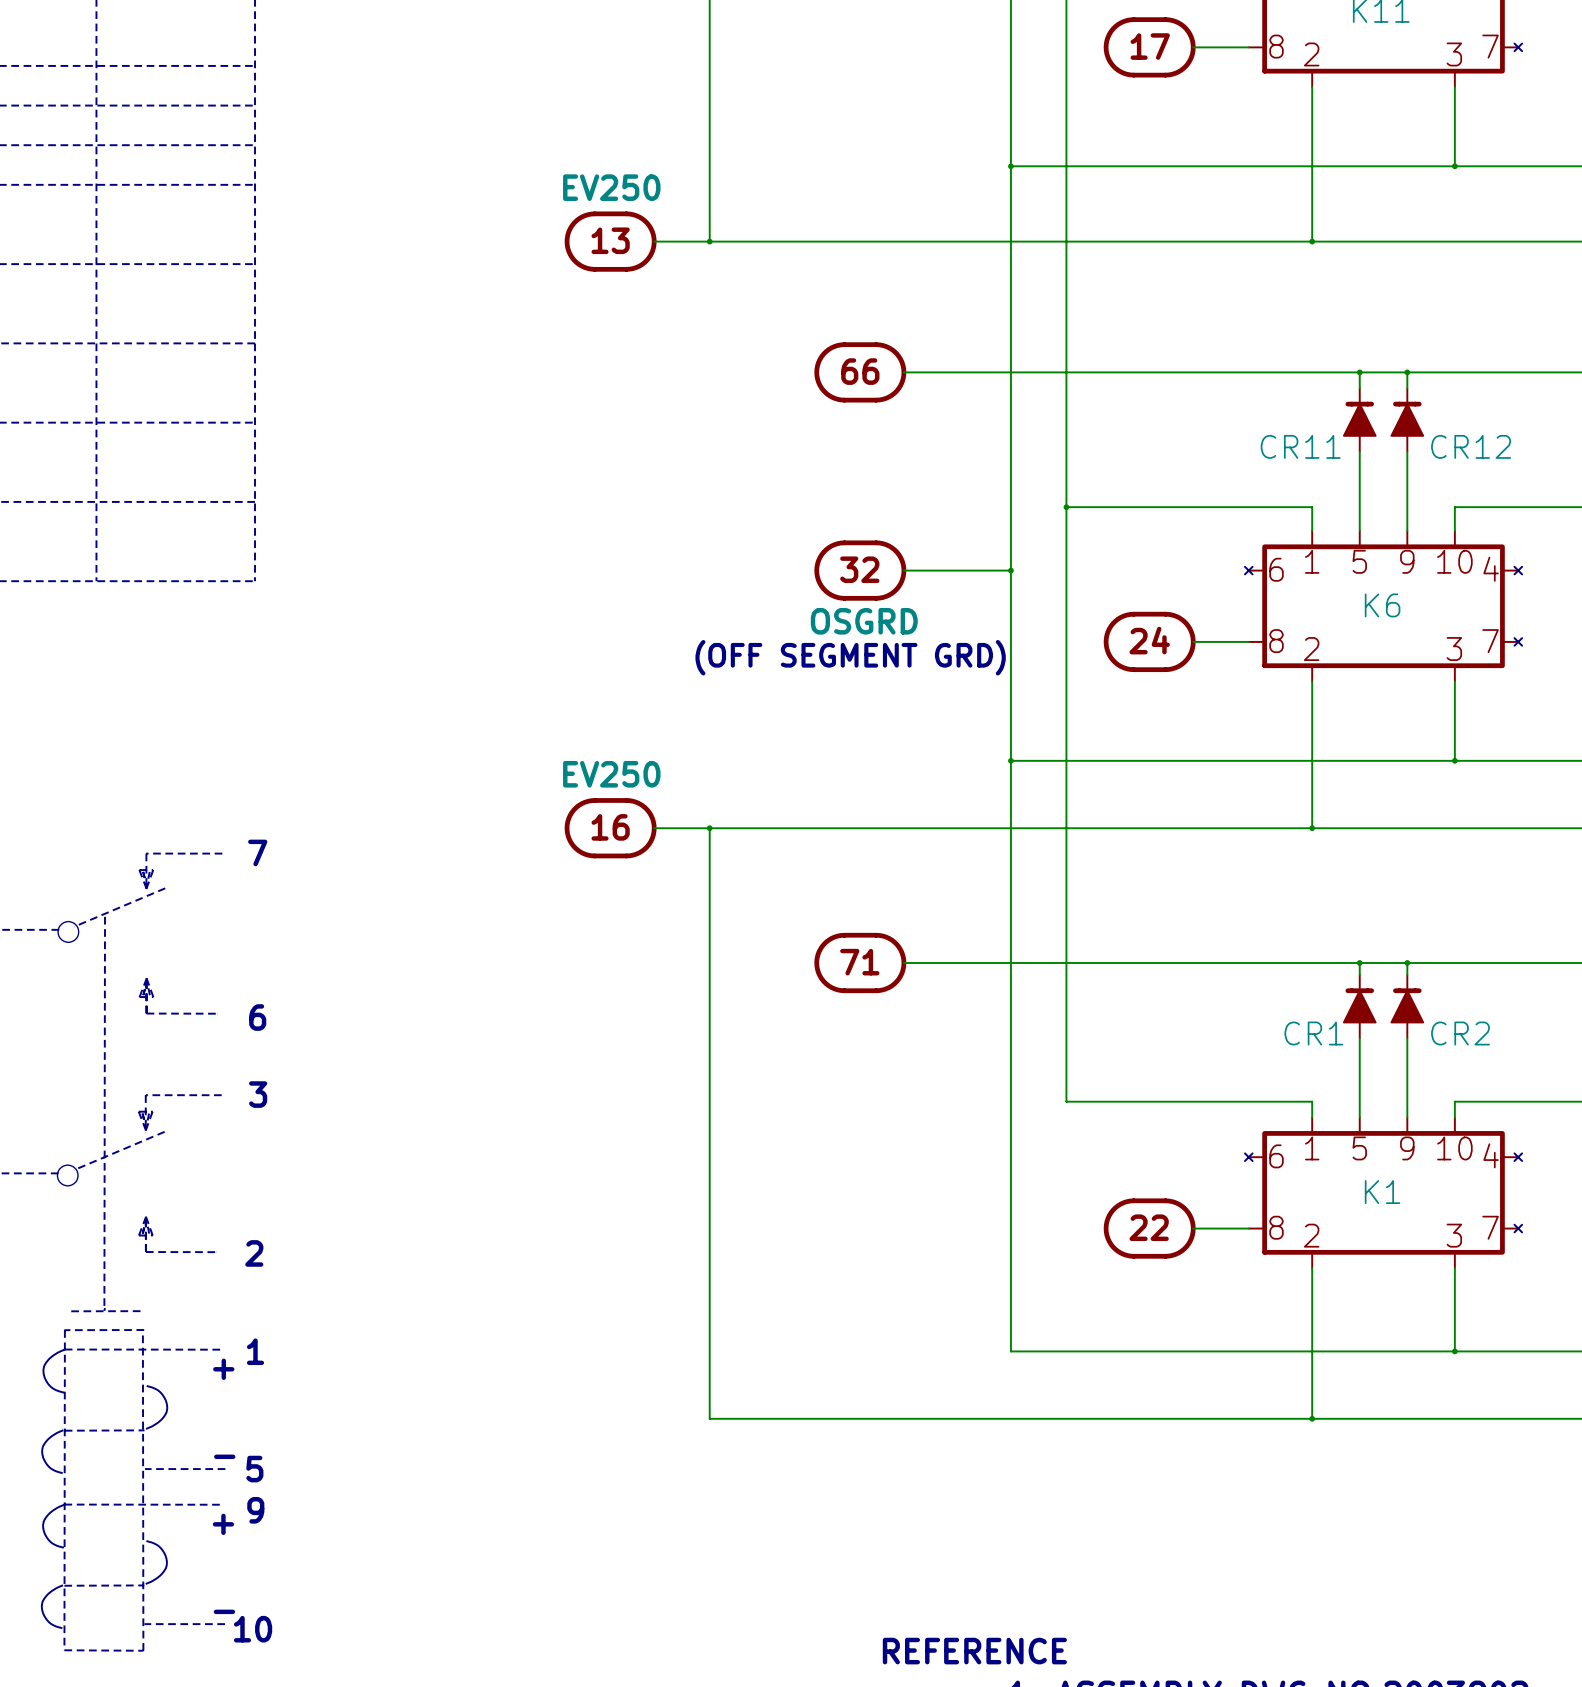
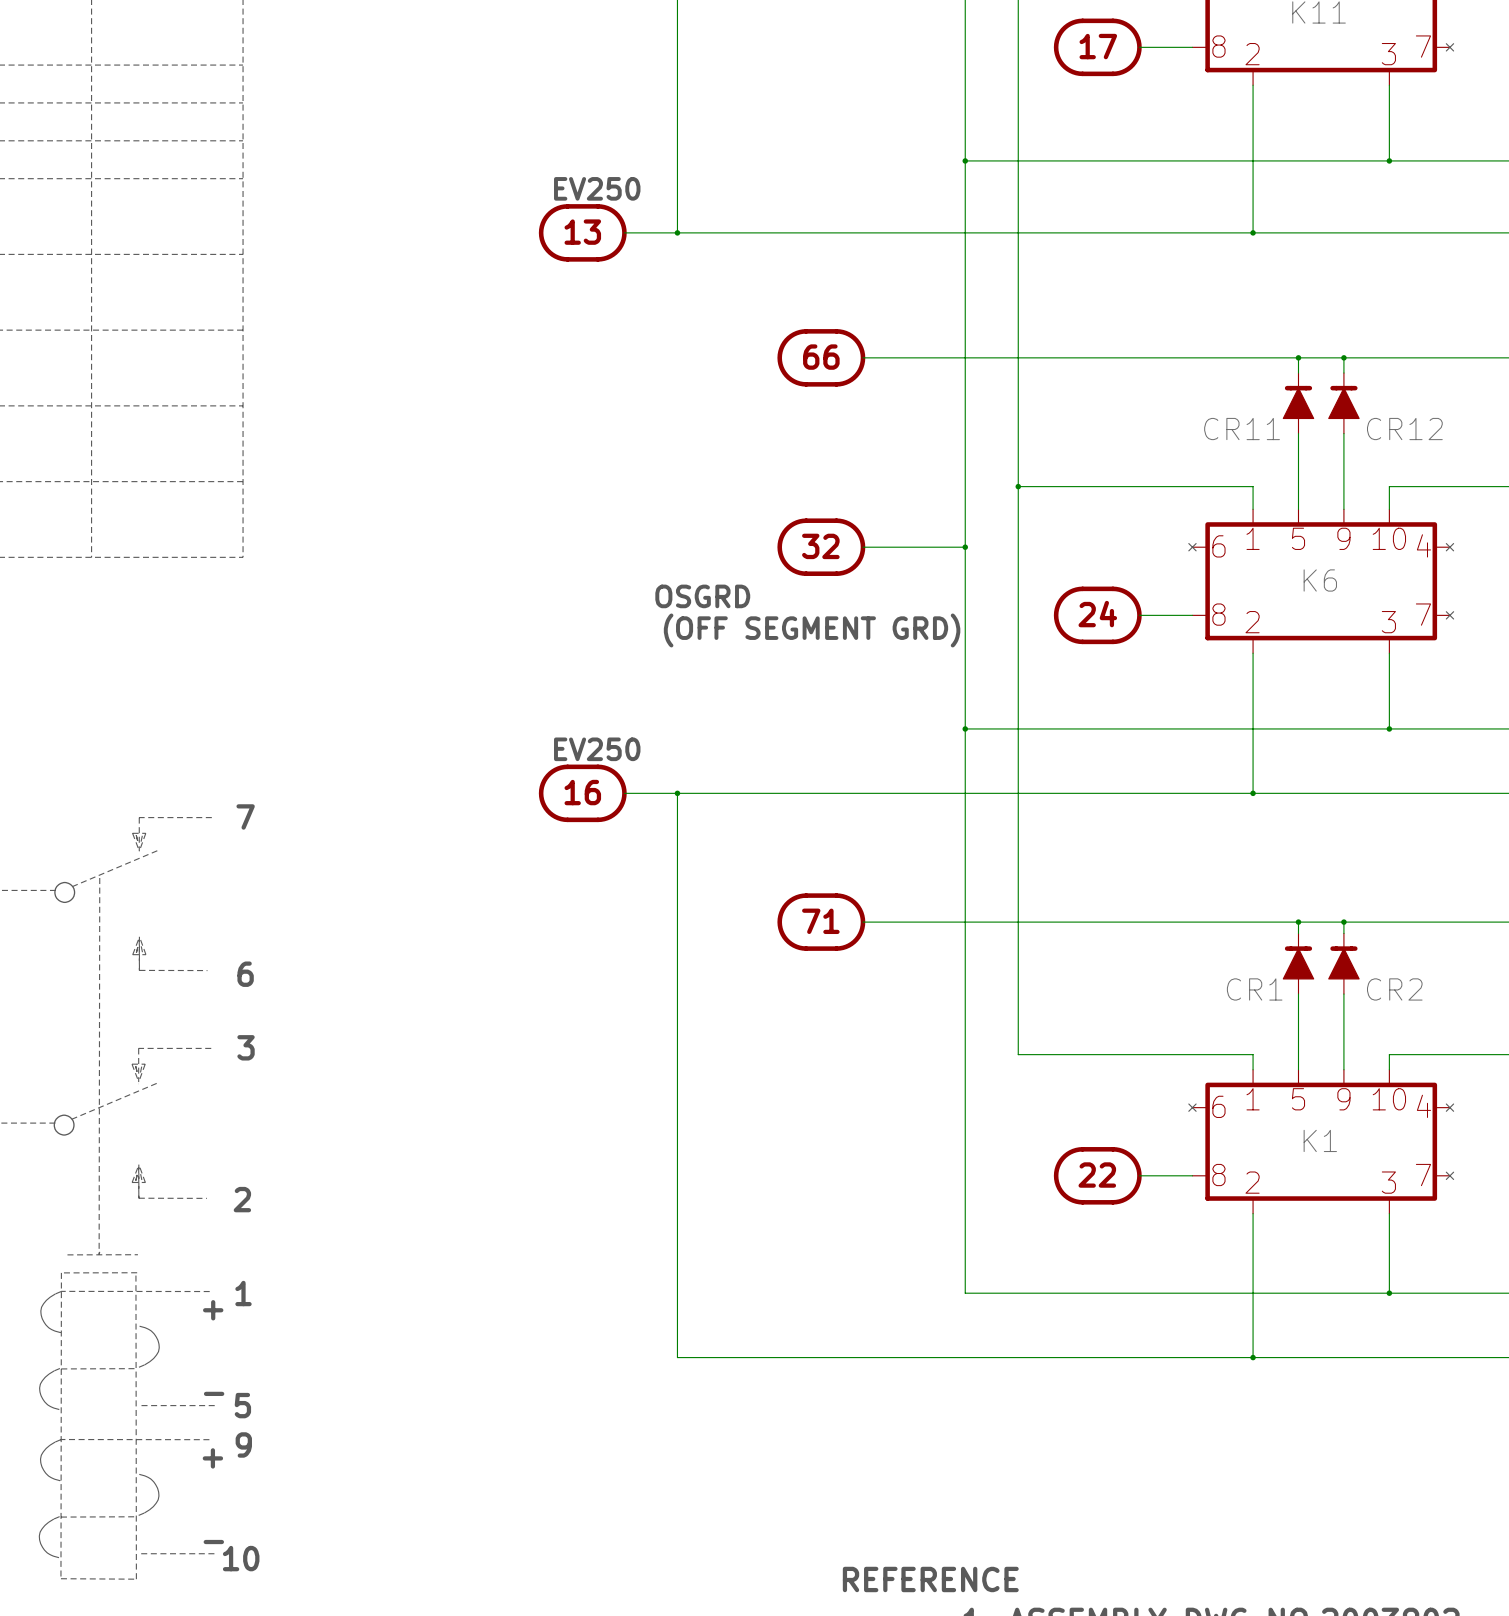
part text: EV250 (611, 187) -> none
text: none -> EV250 (597, 188)
part text: OSGRD (864, 621) -> none
text: none -> OSGRD (702, 596)
part text: EV250 (611, 774) -> none
text: none -> EV250 (597, 749)

